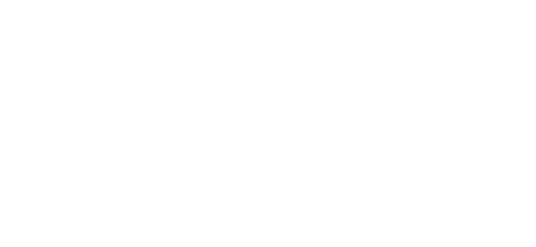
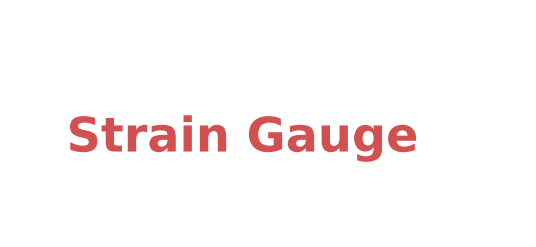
text: none -> Strain Gauge (243, 138)

